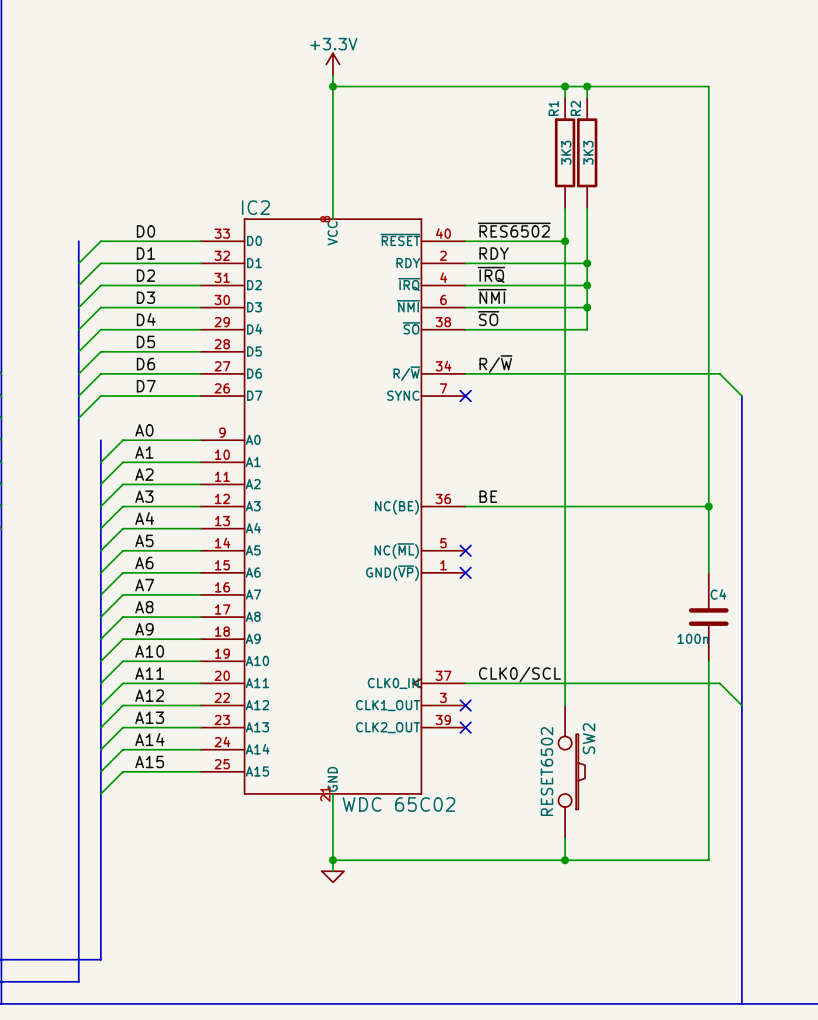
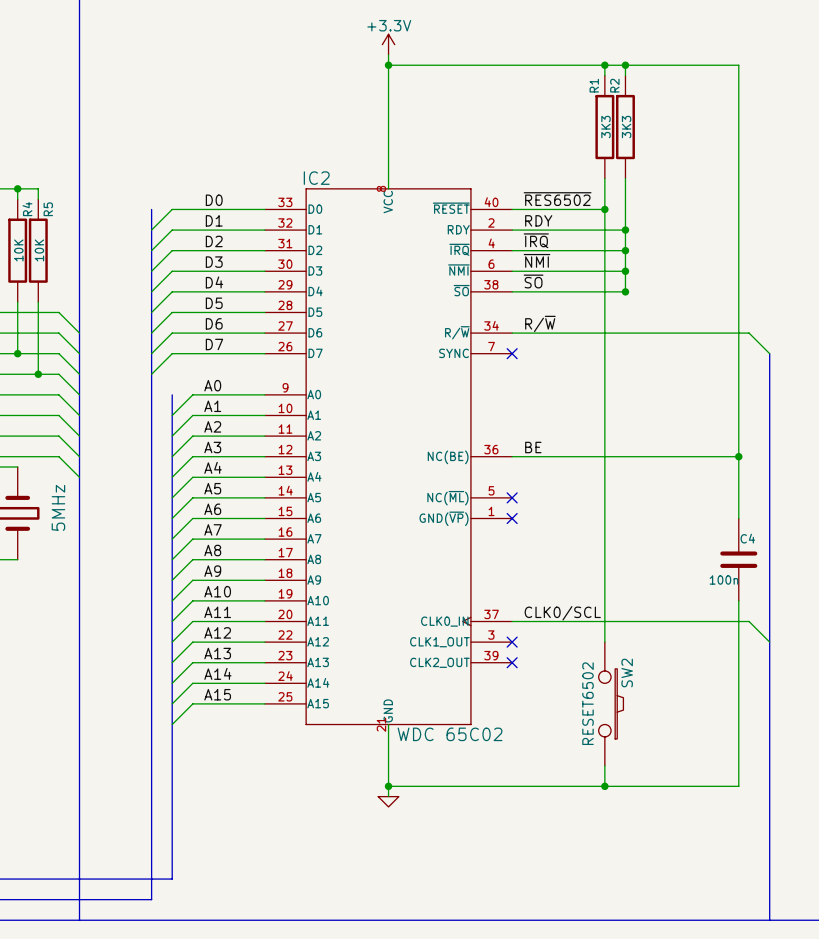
junction: none -> (625, 291)

